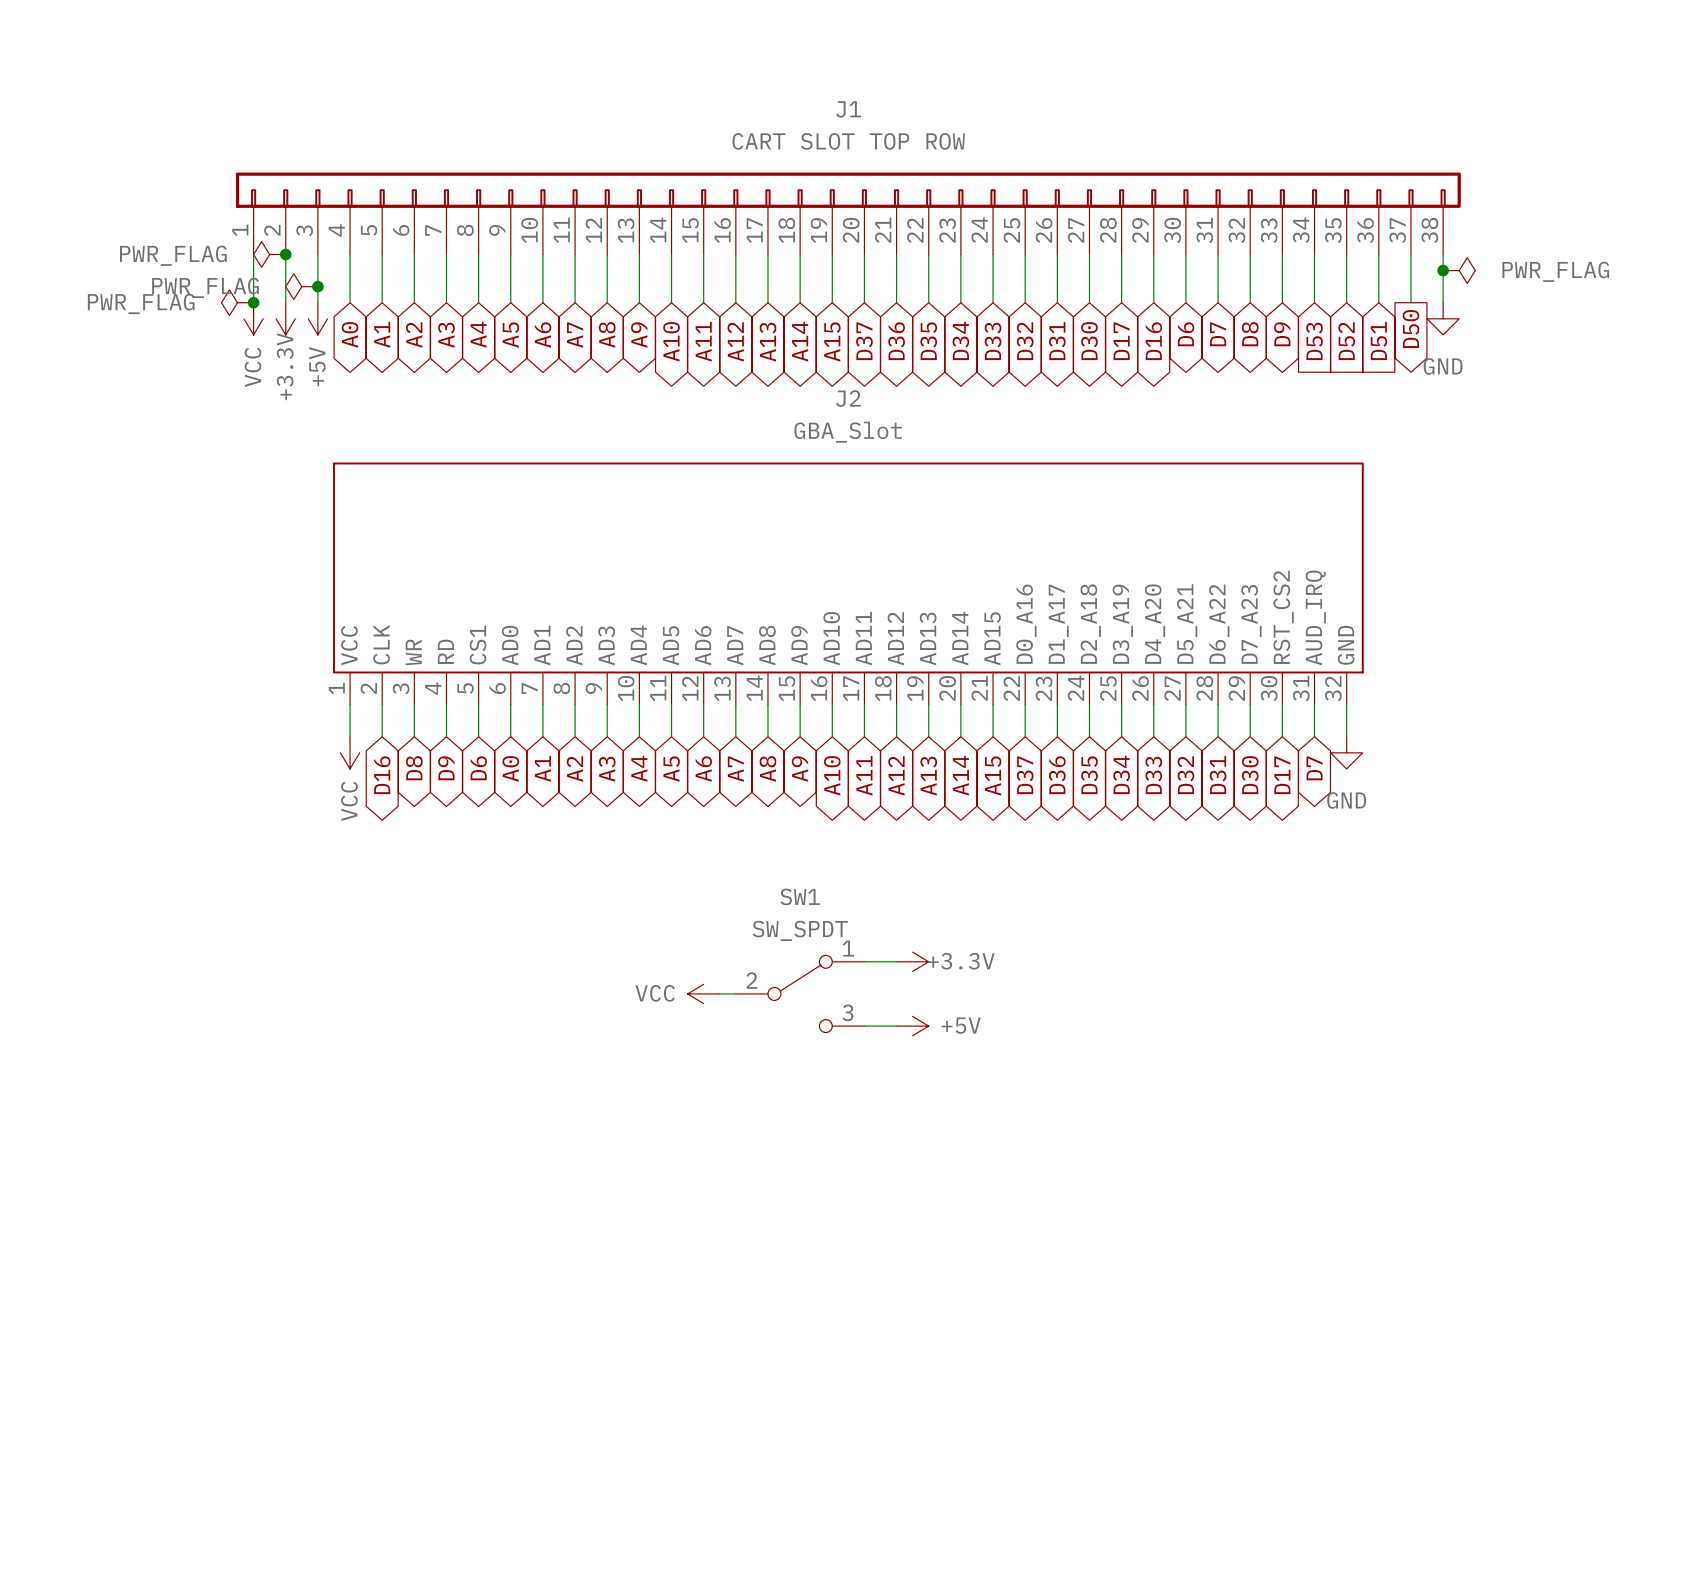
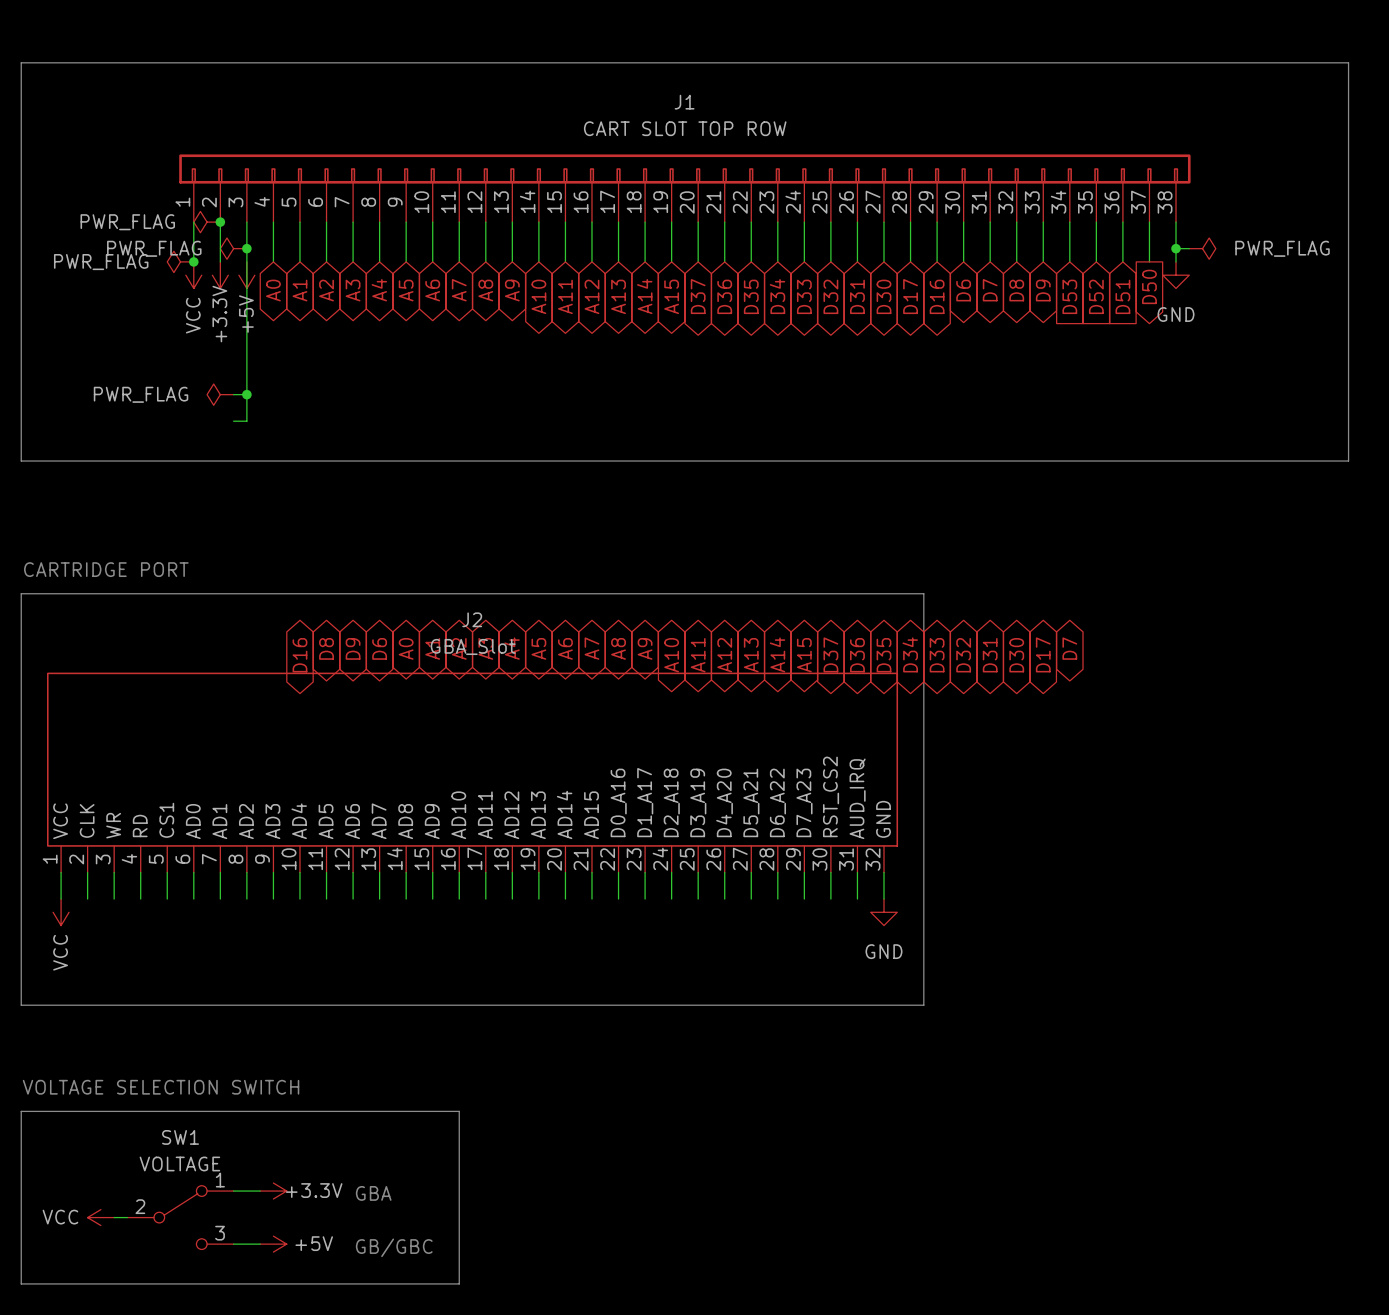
line: none -> (21, 62) (21, 461) (1348, 461) (1348, 62) (21, 62)
junction position: (1443, 270) -> (1176, 248)
power symbol position: PWR_FLAG (1459, 270) -> PWR_FLAG (1202, 248)
wire: none -> (1176, 248) (1189, 248)
wire: none -> (246, 261) (246, 421) (233, 421)
power symbol: none -> PWR_FLAG (220, 394)
wire: none -> (233, 394) (246, 394)
junction: none -> (246, 394)
J2 position: (848, 583) -> (472, 772)
text: none -> CARTRIDGE PORT (106, 569)
line: none -> (21, 593) (21, 1005) (923, 1005) (923, 593) (21, 593)
wire: (350, 704) (350, 736) -> none
wire: (382, 704) (382, 736) -> none
wire: (414, 704) (414, 736) -> none
wire: (446, 704) (446, 736) -> none
wire: (478, 704) (478, 736) -> none
wire: (510, 704) (510, 736) -> none
wire: (542, 704) (542, 736) -> none
wire: (575, 704) (575, 736) -> none
wire: (607, 704) (607, 736) -> none
wire: (639, 704) (639, 736) -> none
wire: (671, 704) (671, 736) -> none
wire: (703, 704) (703, 736) -> none
wire: (735, 704) (735, 736) -> none
wire: (767, 704) (767, 736) -> none
wire: (800, 704) (800, 736) -> none
wire: (832, 704) (832, 736) -> none
wire: (864, 704) (864, 736) -> none
wire: (896, 704) (896, 736) -> none
wire: (928, 704) (928, 736) -> none
wire: (960, 704) (960, 736) -> none
wire: (993, 704) (993, 736) -> none
wire: (1025, 704) (1025, 736) -> none
wire: (1057, 704) (1057, 736) -> none
wire: (1089, 704) (1089, 736) -> none
wire: (1121, 704) (1121, 736) -> none
wire: (1153, 704) (1153, 736) -> none
wire: (1185, 704) (1185, 736) -> none
wire: (1218, 704) (1218, 736) -> none
wire: (1250, 704) (1250, 736) -> none
wire: (1282, 704) (1282, 736) -> none
wire: (1314, 704) (1314, 736) -> none
wire: (1346, 704) (1346, 736) -> none
power symbol: VCC (350, 752) -> none
power symbol: GND (1346, 752) -> none
SW1 value: SW_SPDT (800, 930) -> VOLTAGE (179, 1163)
wire: (864, 961) (896, 961) -> none
power symbol: +3.3V (912, 961) -> none
power symbol: VCC (703, 993) -> none
wire: (719, 993) (735, 993) -> none
SW1 position: (800, 993) -> (180, 1217)
wire: (864, 1026) (896, 1026) -> none
power symbol: +5V (912, 1026) -> none
wire: none -> (61, 872) (61, 899)
wire: none -> (87, 872) (87, 899)
wire: none -> (114, 872) (114, 899)
wire: none -> (140, 872) (140, 899)
wire: none -> (167, 872) (167, 899)
wire: none -> (193, 872) (193, 899)
wire: none -> (220, 872) (220, 899)
wire: none -> (246, 872) (246, 899)
wire: none -> (273, 872) (273, 899)
wire: none -> (299, 872) (299, 899)
wire: none -> (326, 872) (326, 899)
wire: none -> (353, 872) (353, 899)
wire: none -> (379, 872) (379, 899)
wire: none -> (406, 872) (406, 899)
wire: none -> (432, 872) (432, 899)
wire: none -> (459, 872) (459, 899)
wire: none -> (485, 872) (485, 899)
wire: none -> (512, 872) (512, 899)
wire: none -> (538, 872) (538, 899)
wire: none -> (565, 872) (565, 899)
wire: none -> (591, 872) (591, 899)
wire: none -> (618, 872) (618, 899)
wire: none -> (645, 872) (645, 899)
wire: none -> (671, 872) (671, 899)
wire: none -> (698, 872) (698, 899)
wire: none -> (724, 872) (724, 899)
wire: none -> (751, 872) (751, 899)
wire: none -> (777, 872) (777, 899)
wire: none -> (804, 872) (804, 899)
wire: none -> (830, 872) (830, 899)
wire: none -> (857, 872) (857, 899)
wire: none -> (883, 872) (883, 899)
power symbol: none -> VCC (61, 912)
power symbol: none -> GND (883, 912)
text: none -> VOLTAGE SELECTION SWITCH (161, 1087)
line: none -> (21, 1111) (21, 1283) (459, 1283) (459, 1111) (21, 1111)
wire: none -> (233, 1191) (260, 1191)
power symbol: none -> +3.3V (273, 1191)
text: none -> GBA (373, 1193)
power symbol: none -> VCC (100, 1217)
wire: none -> (114, 1217) (127, 1217)
wire: none -> (233, 1244) (260, 1244)
power symbol: none -> +5V (273, 1244)
text: none -> GB/GBC (394, 1247)

